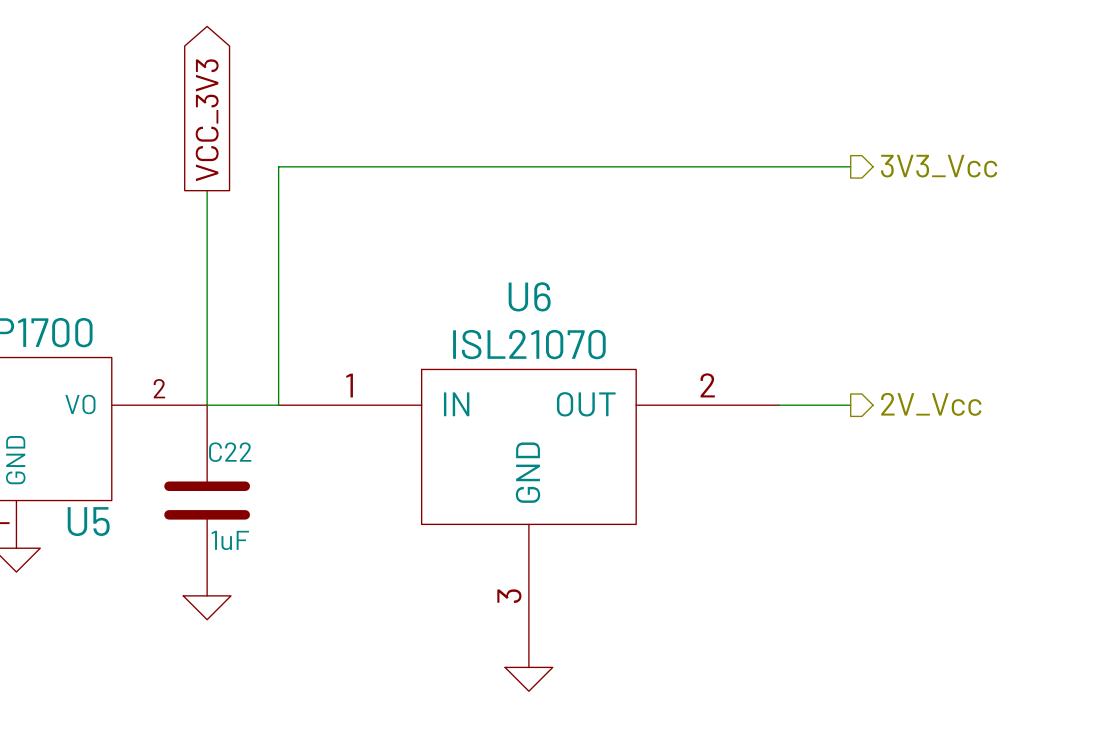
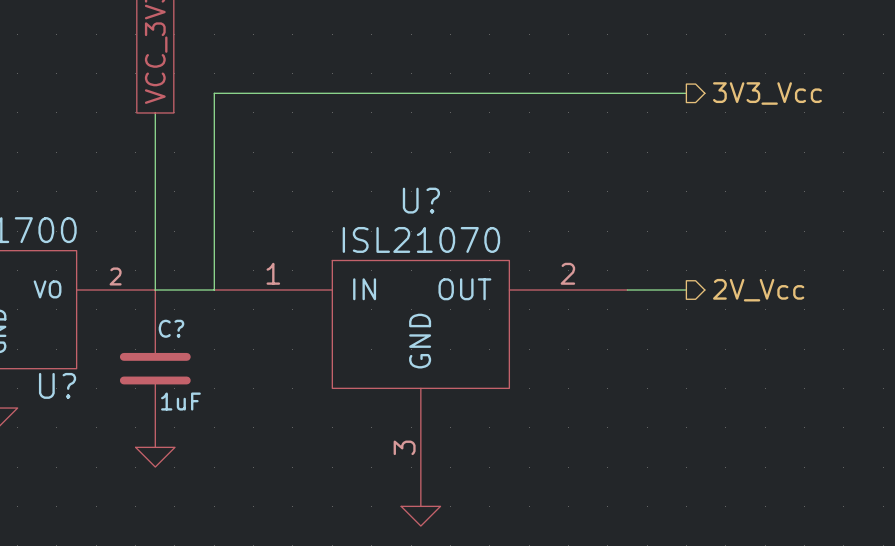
U6 name: U6 (529, 296) -> U? (421, 200)
C22 name: C22 (230, 452) -> C? (171, 328)
U5 name: U5 (88, 521) -> U? (57, 385)

